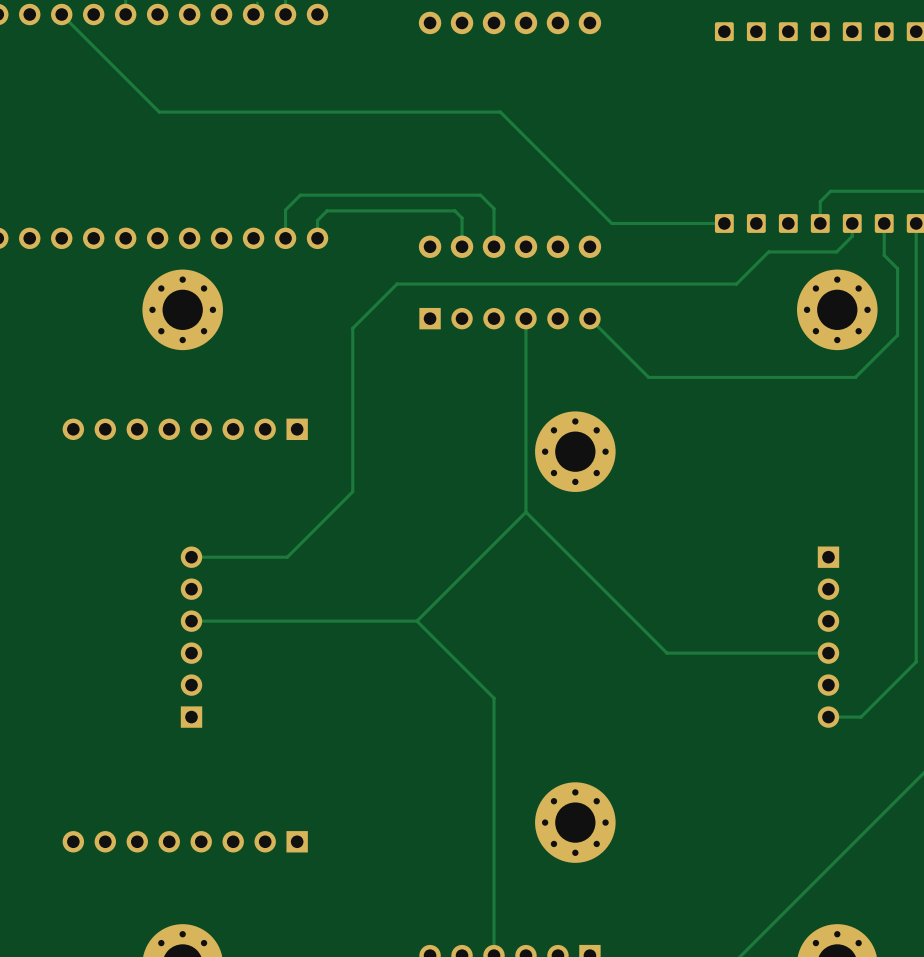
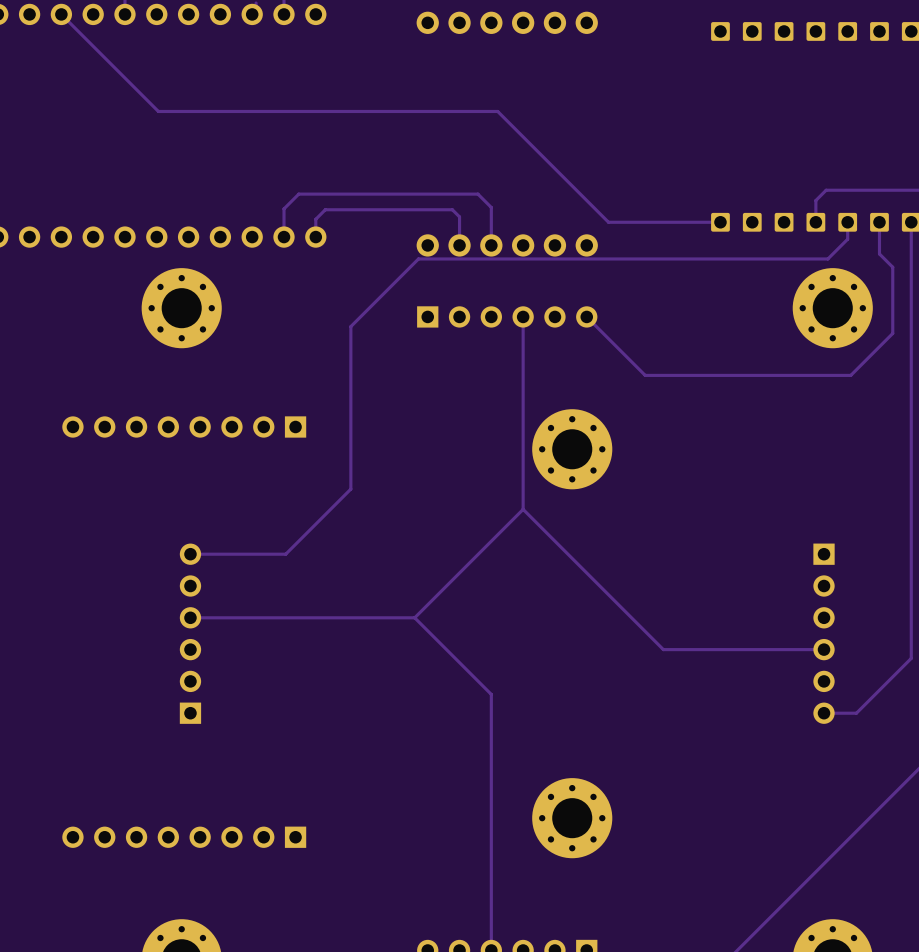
track: (852, 236) (836, 251) (768, 251) (736, 284) (397, 284) -> (847, 235) (847, 239) (827, 258) (418, 258) (394, 282)

